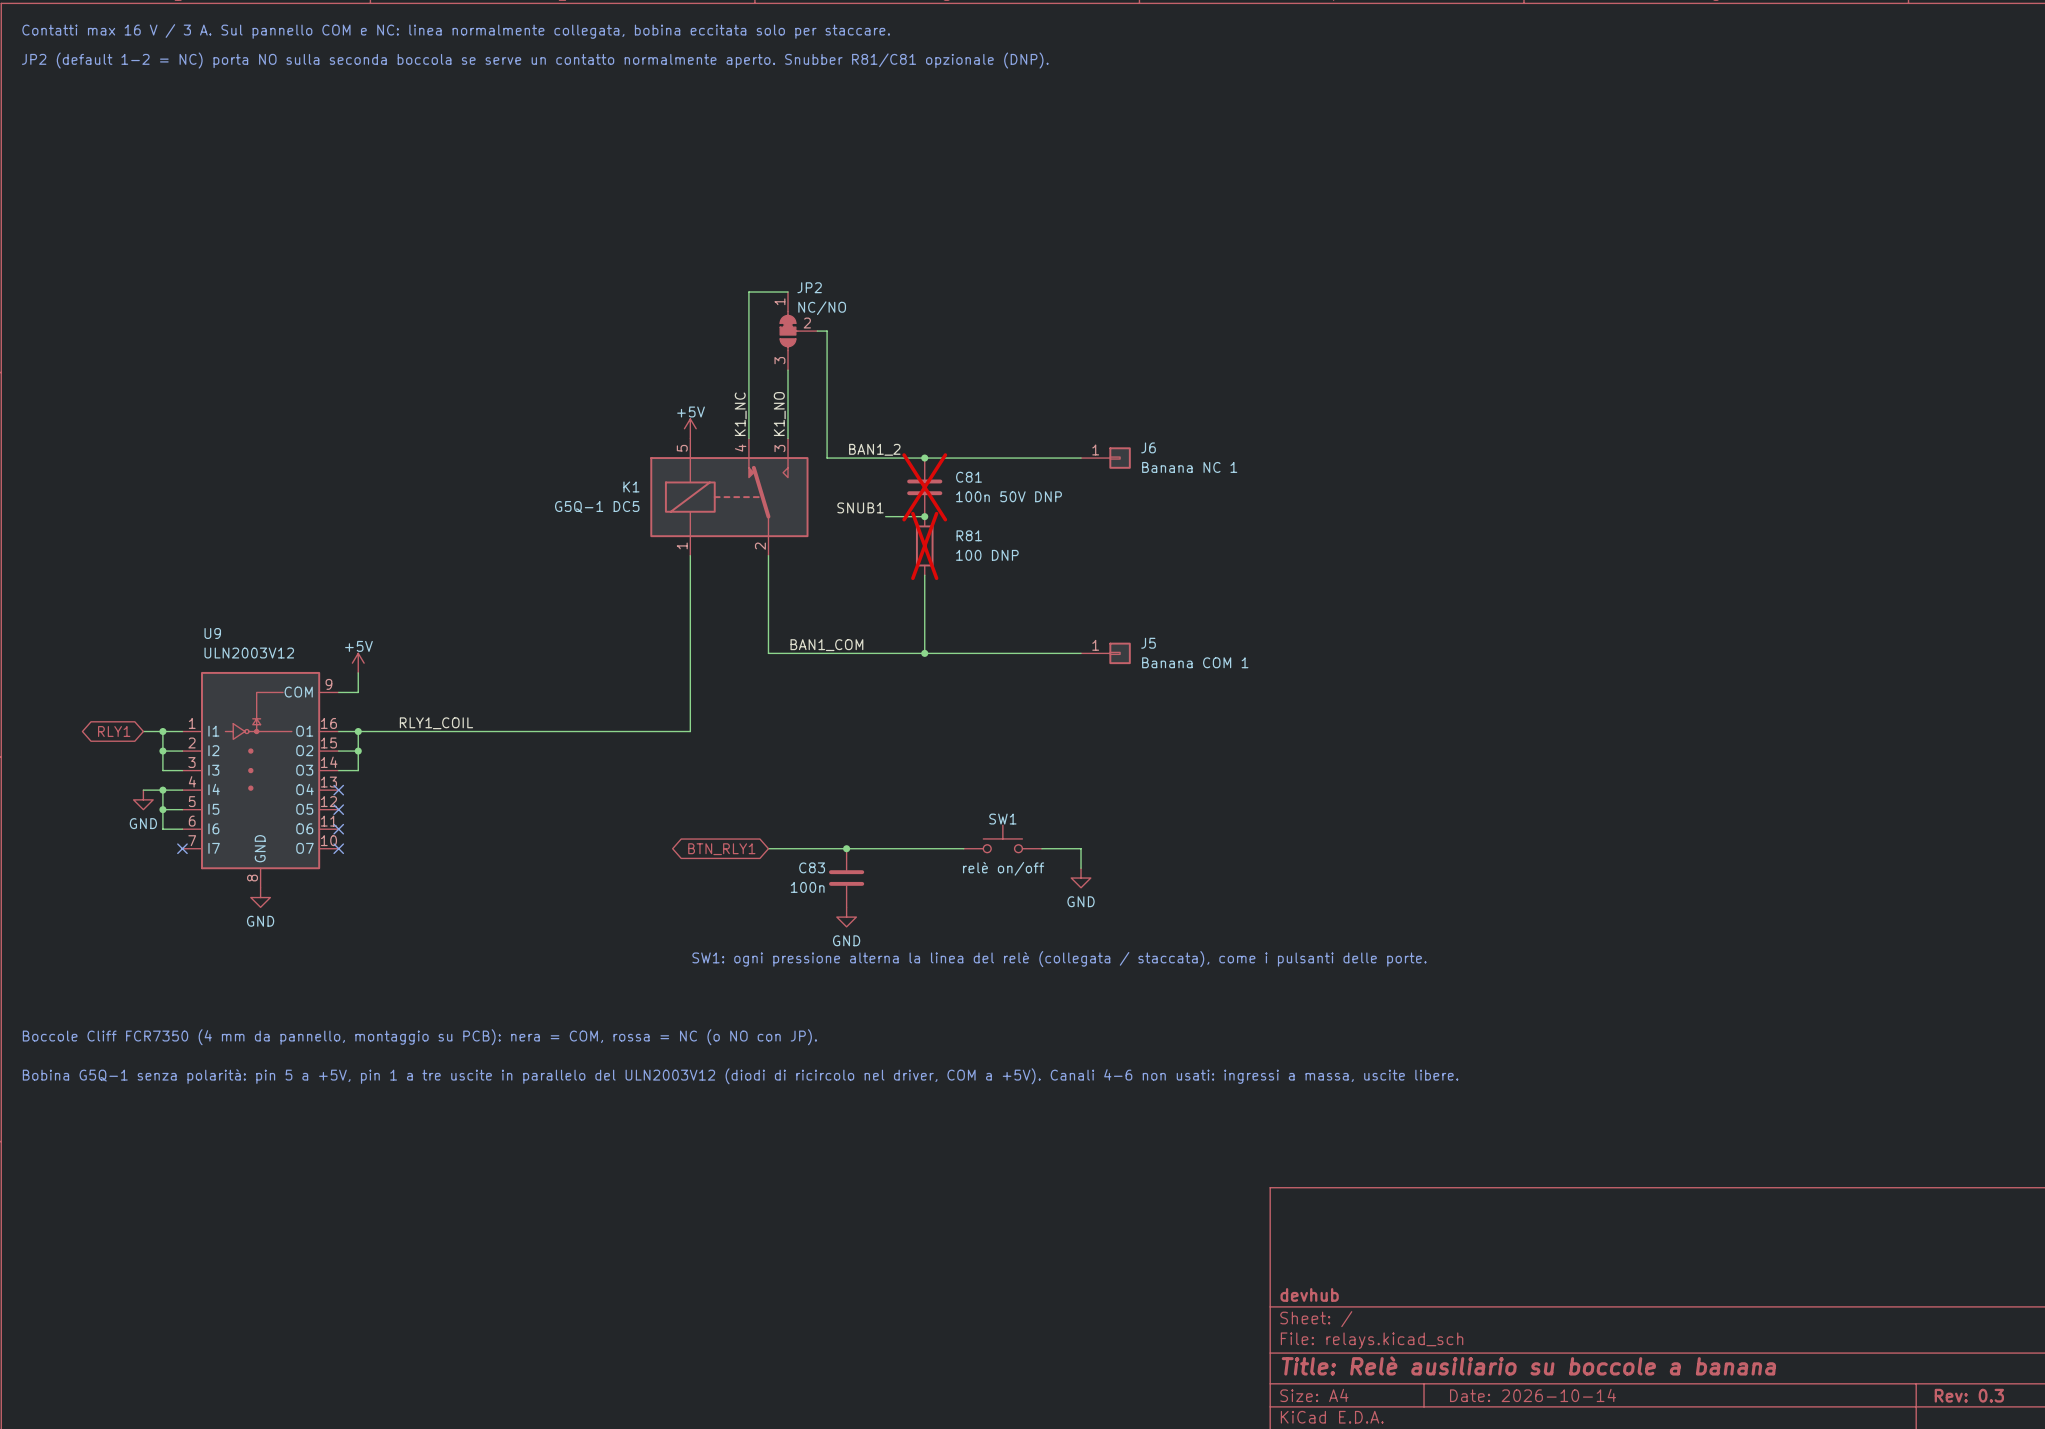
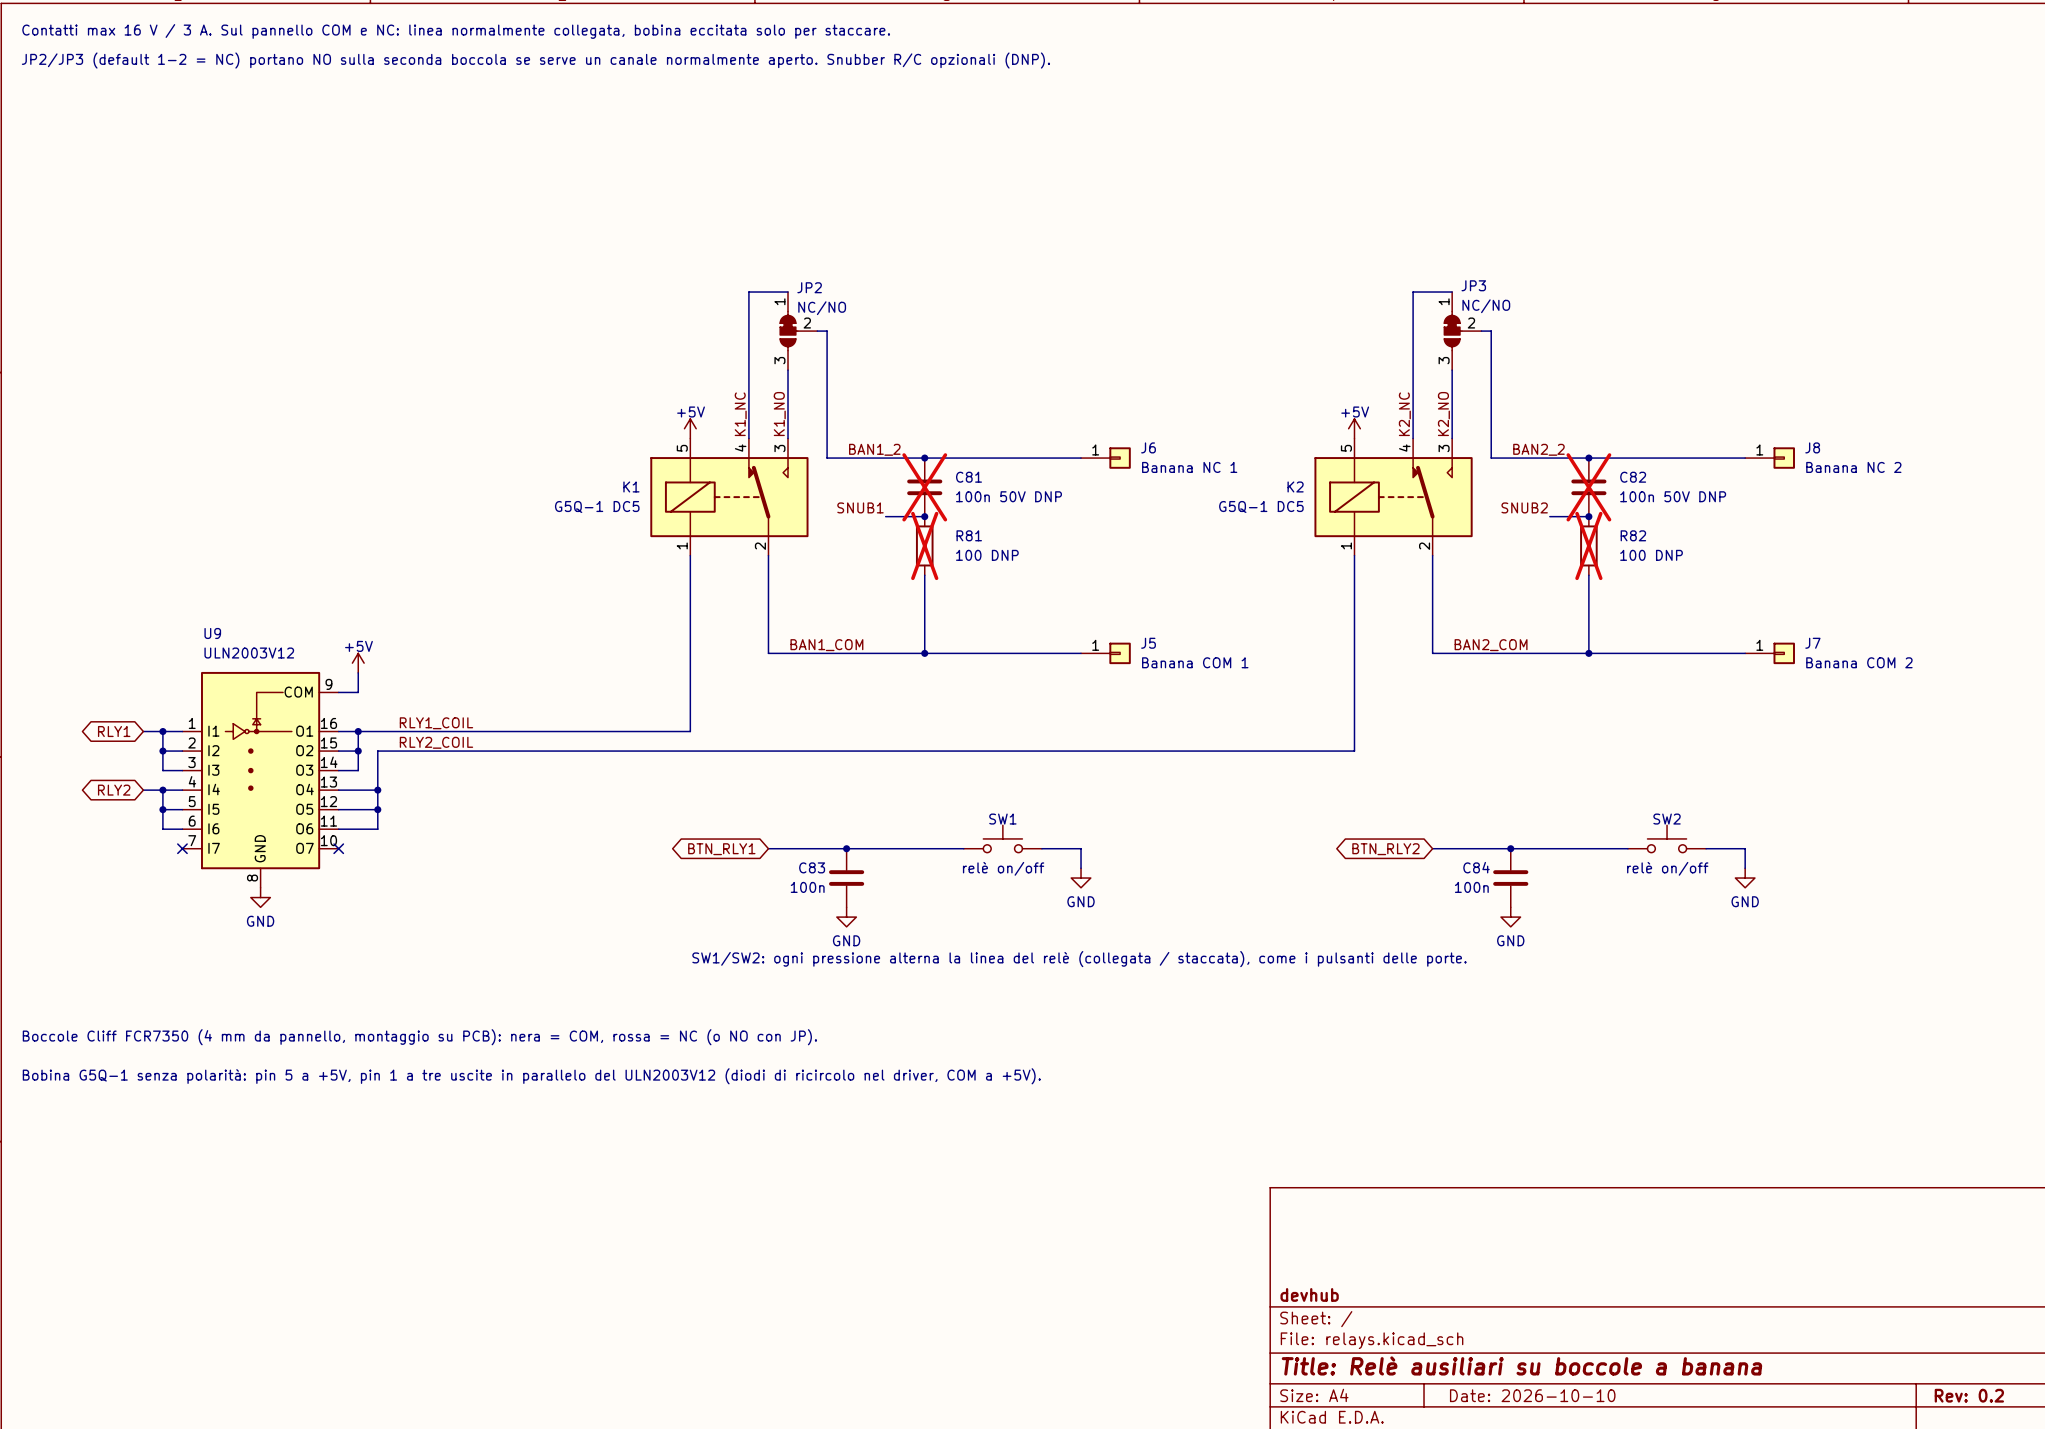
text: JP2 (default 1-2 = NC) porta NO sulla seconda boccola se serve un contatto normalmente aperto. Snubber R81/C81 opzionale (DNP). (535, 60) -> JP2/JP3 (default 1-2 = NC) portano NO sulla seconda boccola se serve un canale normalmente aperto. Snubber R/C opzionali (DNP). (535, 60)
wire: none -> (1452, 292) (1413, 292) (1413, 438)
JP3: none -> NC/NO (1462, 331)
wire: none -> (1481, 331) (1491, 331) (1491, 458) (1745, 458)
wire: none -> (1452, 370) (1452, 438)
label: none -> K2_NC (1404, 414)
label: none -> K2_NO (1443, 414)
power symbol: none -> +5V (1354, 428)
label: none -> BAN2_2 (1538, 449)
junction: none -> (1588, 458)
J8: none -> Banana NC 2 (1770, 458)
C82: none -> 100n 50V DNP (1588, 487)
K2: none -> G5Q-1 DC5 (1393, 497)
label: none -> SNUB2 (1524, 507)
wire: none -> (1549, 516) (1588, 516)
junction: none -> (1588, 516)
R82: none -> 100 DNP (1588, 545)
wire: none -> (1354, 555) (1354, 751) (377, 751) (377, 829) (338, 829)
wire: none -> (1432, 555) (1432, 653) (1745, 653)
wire: none -> (1588, 575) (1588, 653)
label: none -> BAN2_COM (1491, 645)
junction: none -> (1588, 653)
J7: none -> Banana COM 2 (1770, 653)
label: none -> RLY2_COIL (436, 742)
global label: none -> RLY2 (114, 790)
wire: none -> (338, 790) (377, 790)
no-connect mark: (338, 790) -> none
junction: none -> (377, 790)
power symbol: GND (143, 799) -> none
wire: none -> (338, 809) (377, 809)
no-connect mark: (338, 809) -> none
junction: none -> (377, 809)
no-connect mark: (338, 829) -> none
SW2: none -> relè on/off (1667, 838)
wire: none -> (1432, 848) (1627, 848)
junction: none -> (1510, 848)
wire: none -> (1706, 848) (1745, 848) (1745, 868)
global label: none -> BTN_RLY2 (1385, 849)
C84: none -> 100n (1510, 878)
power symbol: none -> GND (1745, 878)
power symbol: none -> GND (1510, 917)
text: SW1: ogni pressione alterna la linea del relè (collegata / staccata), come i pulsanti delle porte. (1059, 959) -> SW1/SW2: ogni pressione alterna la linea del relè (collegata / staccata), come i pulsanti delle porte. (1079, 959)
text: Bobina G5Q-1 senza polarità: pin 5 a +5V, pin 1 a tre uscite in parallelo del ULN2003V12 (diodi di ricircolo nel driver, COM a +5V). Canali 4-6 non usati: ingressi a massa, uscite libere. (740, 1076) -> Bobina G5Q-1 senza polarità: pin 5 a +5V, pin 1 a tre uscite in parallelo del ULN2003V12 (diodi di ricircolo nel driver, COM a +5V). (531, 1076)
title block: Title: Relè ausiliario su boccole a banana (1528, 1365) -> Title: Relè ausiliari su boccole a banana (1521, 1365)
title block: Date: 2026-10-14 (1532, 1395) -> Date: 2026-10-10 (1532, 1395)
title block: Rev: 0.3 (1969, 1395) -> Rev: 0.2 (1969, 1395)

